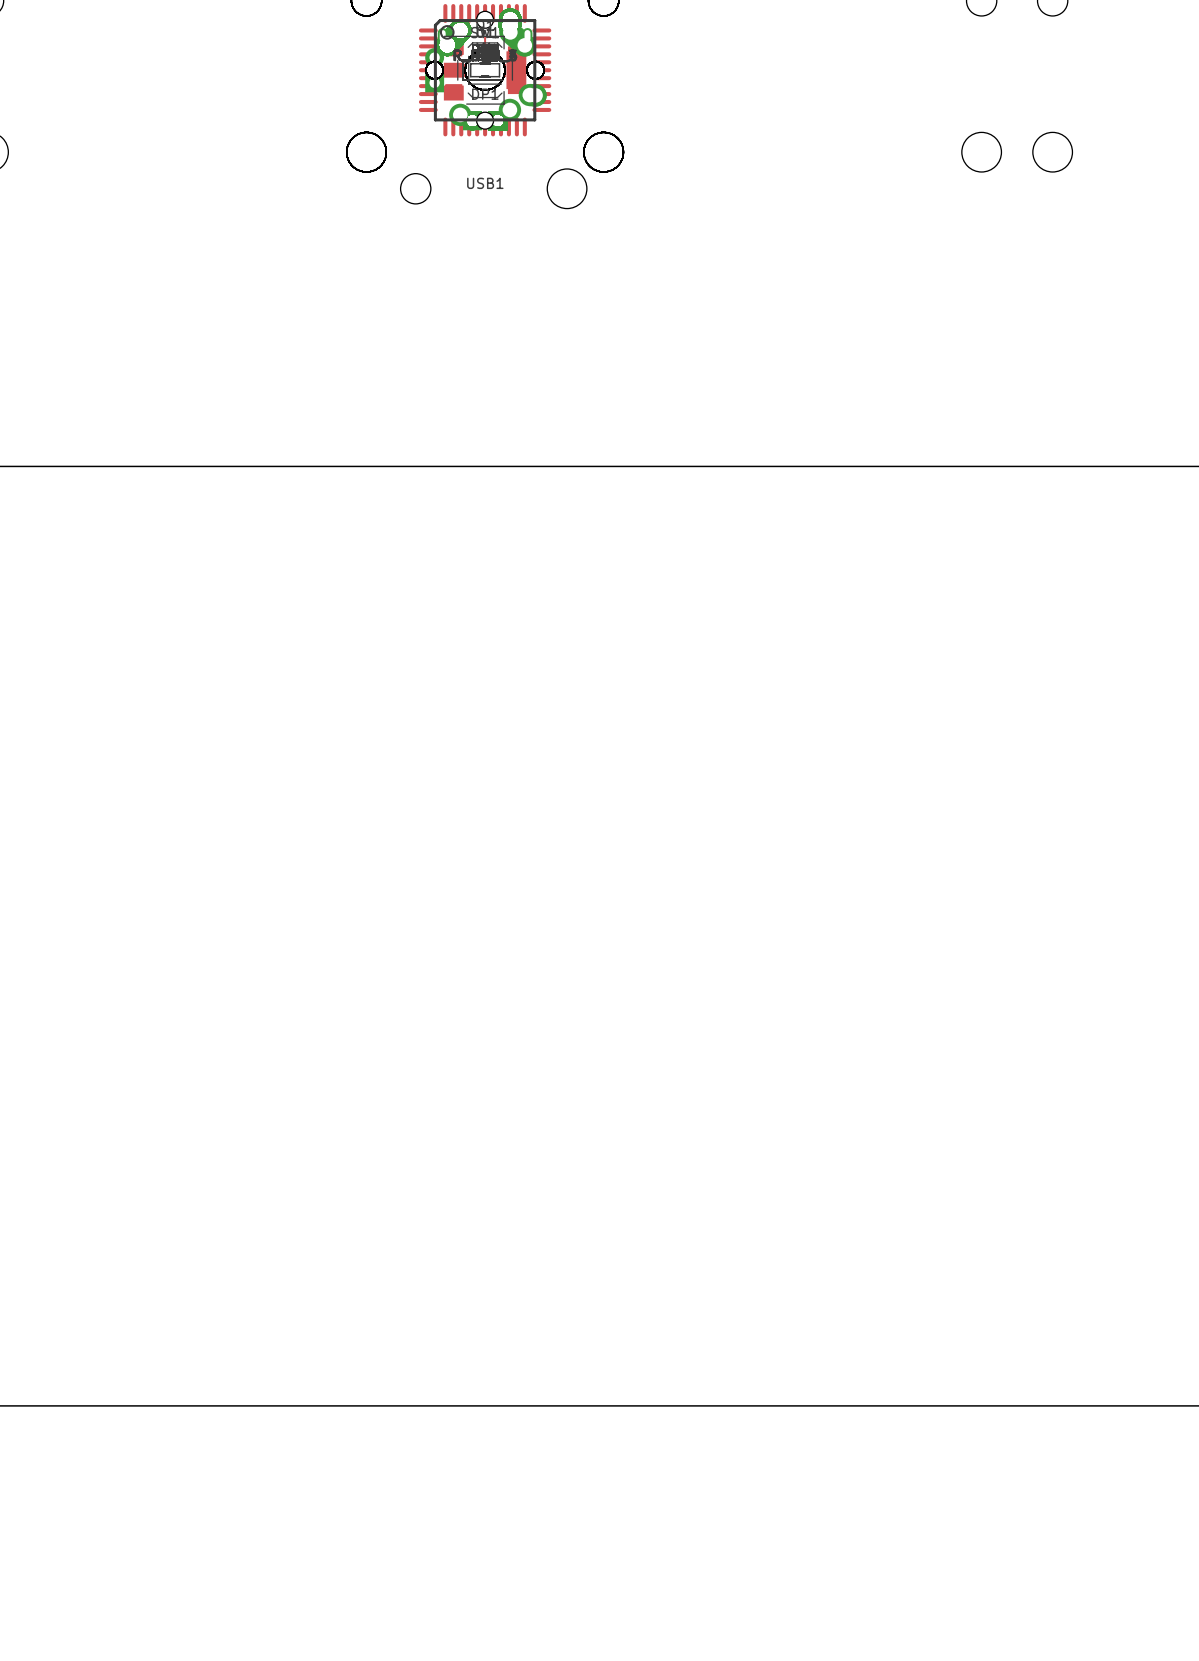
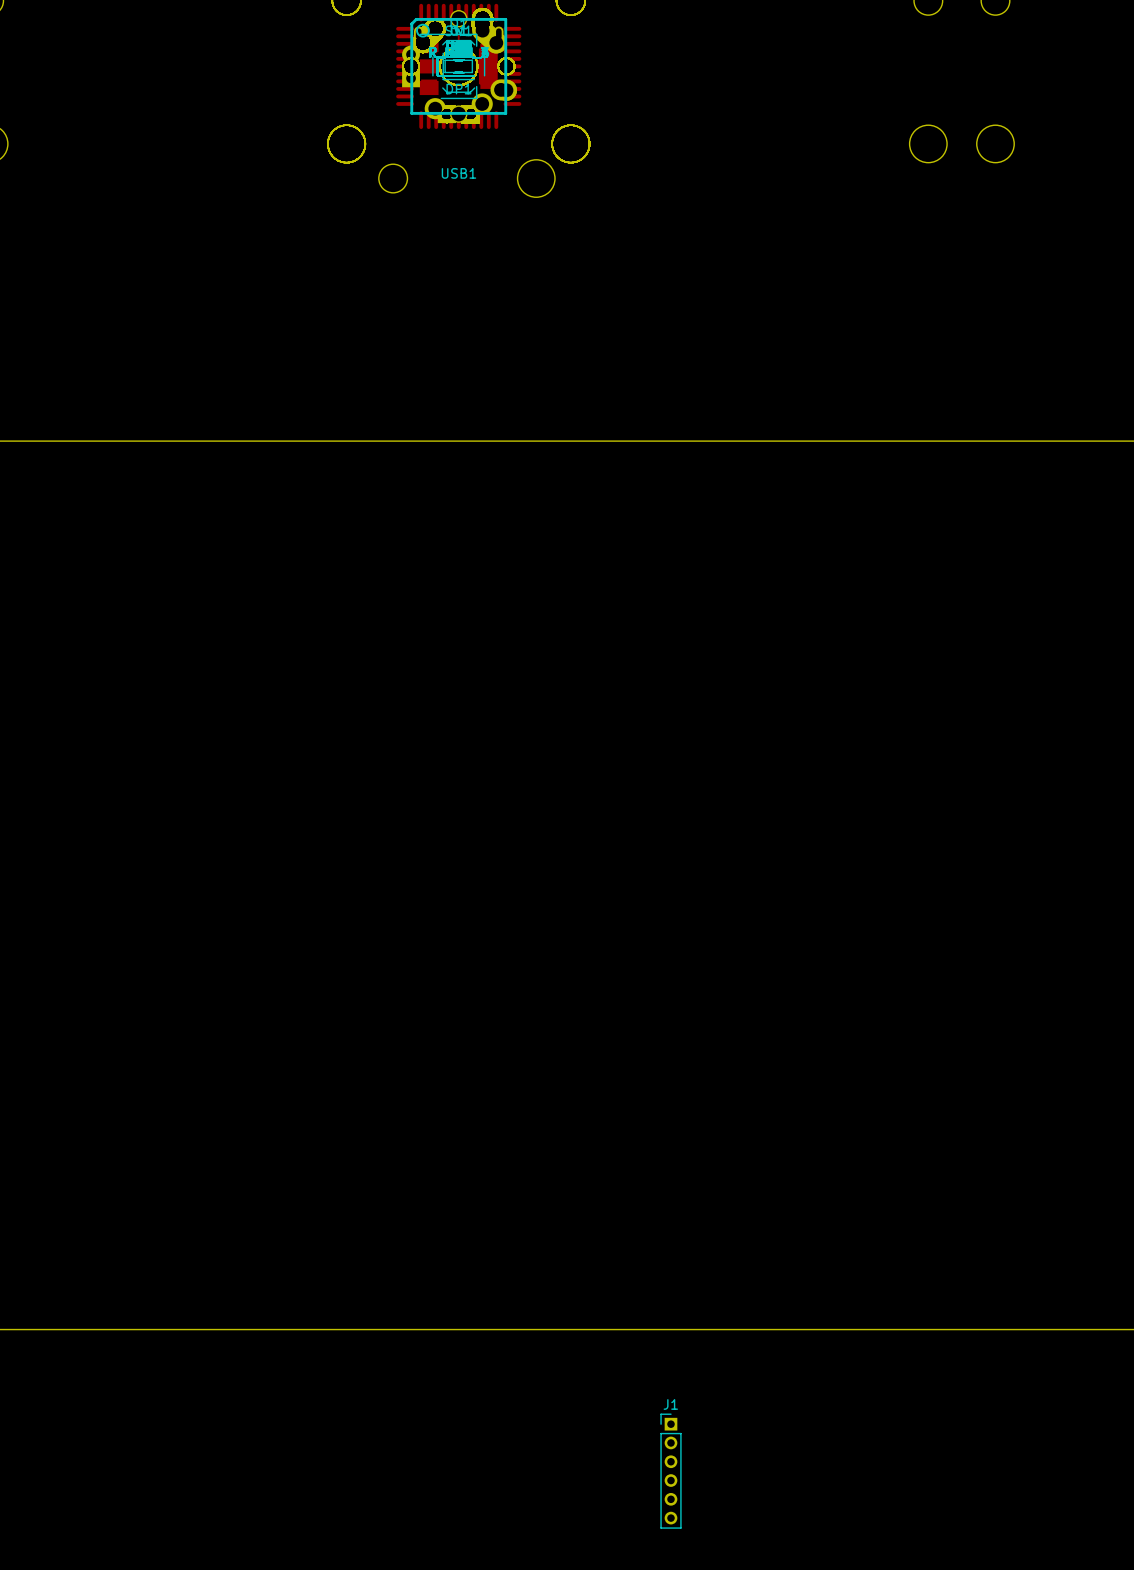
J1: none -> (670, 1471)

